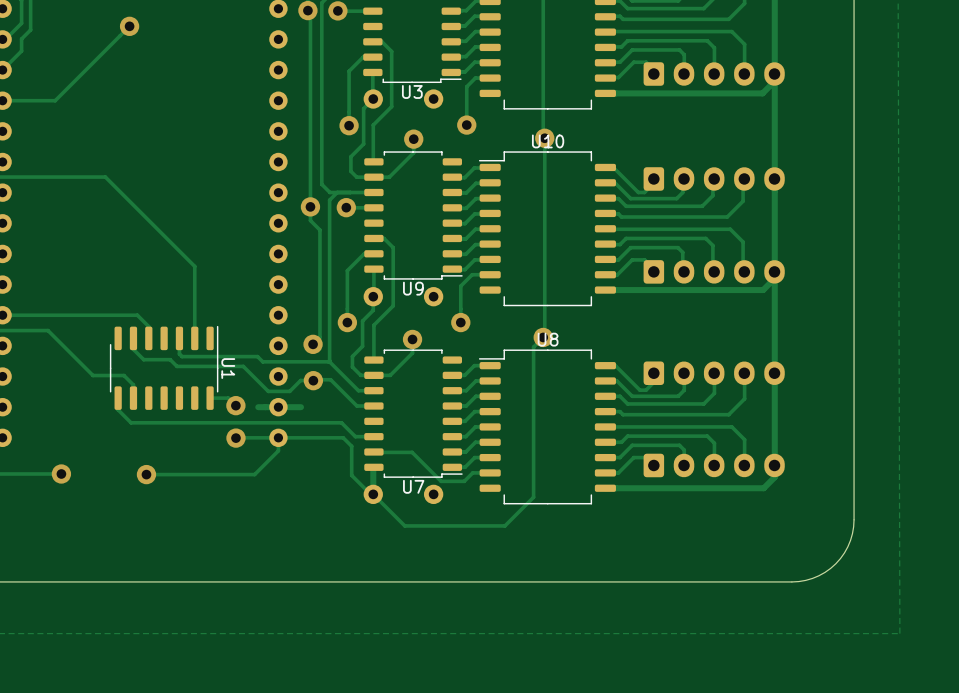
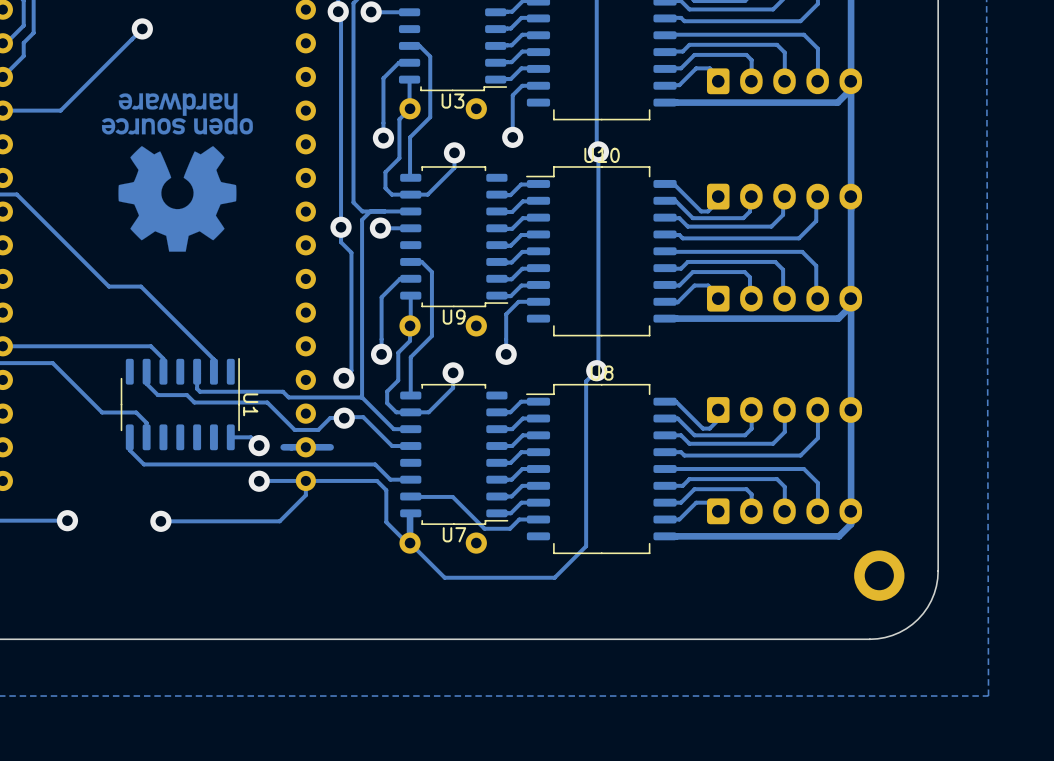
drawing: none -> [101, 93, 253, 252]
track: (15, 177) (105, 177) (194, 266) (194, 327) -> (16, 194) (108, 286) (141, 286) (213, 359)
part: none -> (879, 575)

